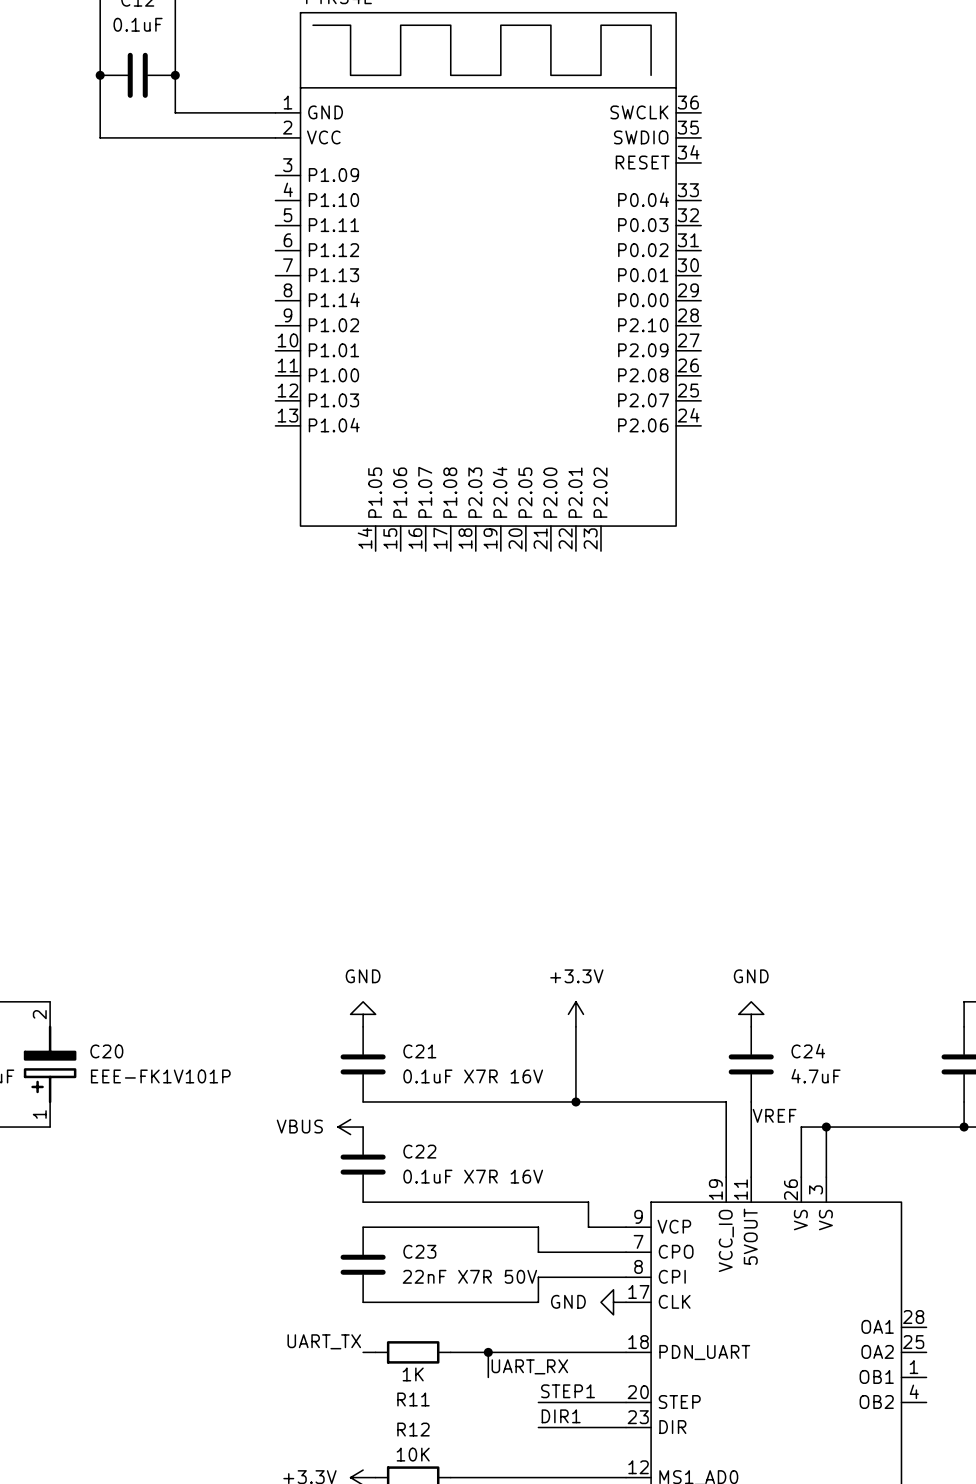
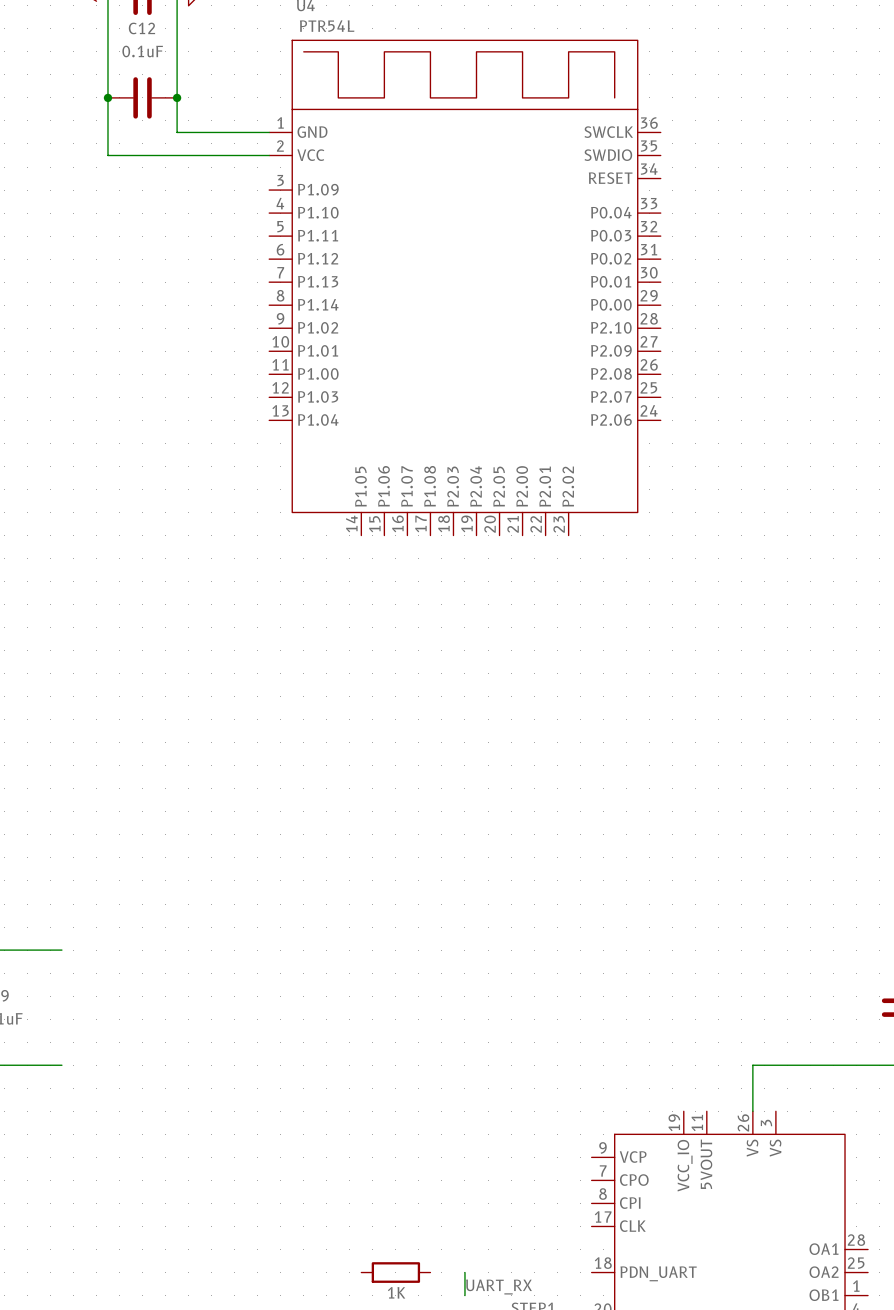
power symbol: GND (363, 1014) -> none
power symbol: +3.3V (575, 1014) -> none
power symbol: GND (751, 1014) -> none
wire: (575, 1026) (575, 1101) -> none
C20: EEE-FK1V101P (50, 1064) -> none
C21: 0.1uF X7R 16V (363, 1064) -> none
C24: 4.7uF (751, 1064) -> none
wire: (363, 1101) (726, 1101) (726, 1177) -> none
junction: (575, 1101) -> none
wire: (751, 1101) (751, 1177) -> none
label: VREF (774, 1115) -> none
power symbol: VBUS (350, 1127) -> none
wire: (826, 1127) (826, 1177) -> none
junction: (826, 1127) -> none
C22: 0.1uF X7R 16V (363, 1164) -> none
wire: (363, 1202) (588, 1202) (588, 1227) (626, 1227) -> none
wire: (363, 1227) (538, 1227) (538, 1252) (626, 1252) -> none
C23: 22nF X7R 50V (363, 1264) -> none
wire: (626, 1277) (538, 1277) (538, 1302) (363, 1302) -> none
power symbol: GND (613, 1302) -> none
label: UART_TX (324, 1341) -> none
wire: (363, 1352) (375, 1352) -> none
wire: (450, 1352) (626, 1352) -> none
junction: (488, 1352) -> none

